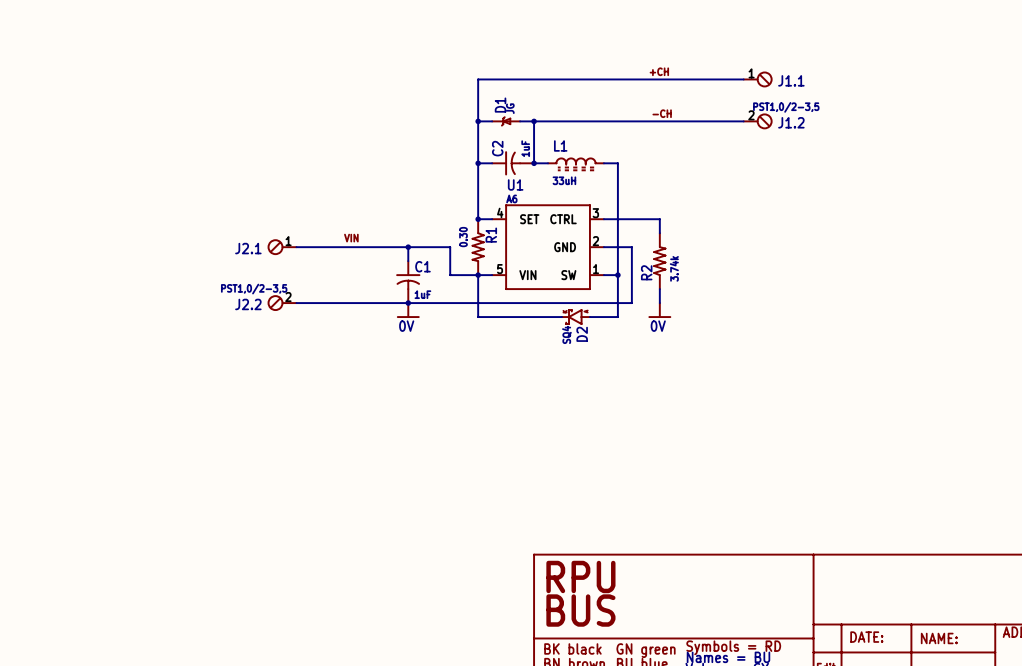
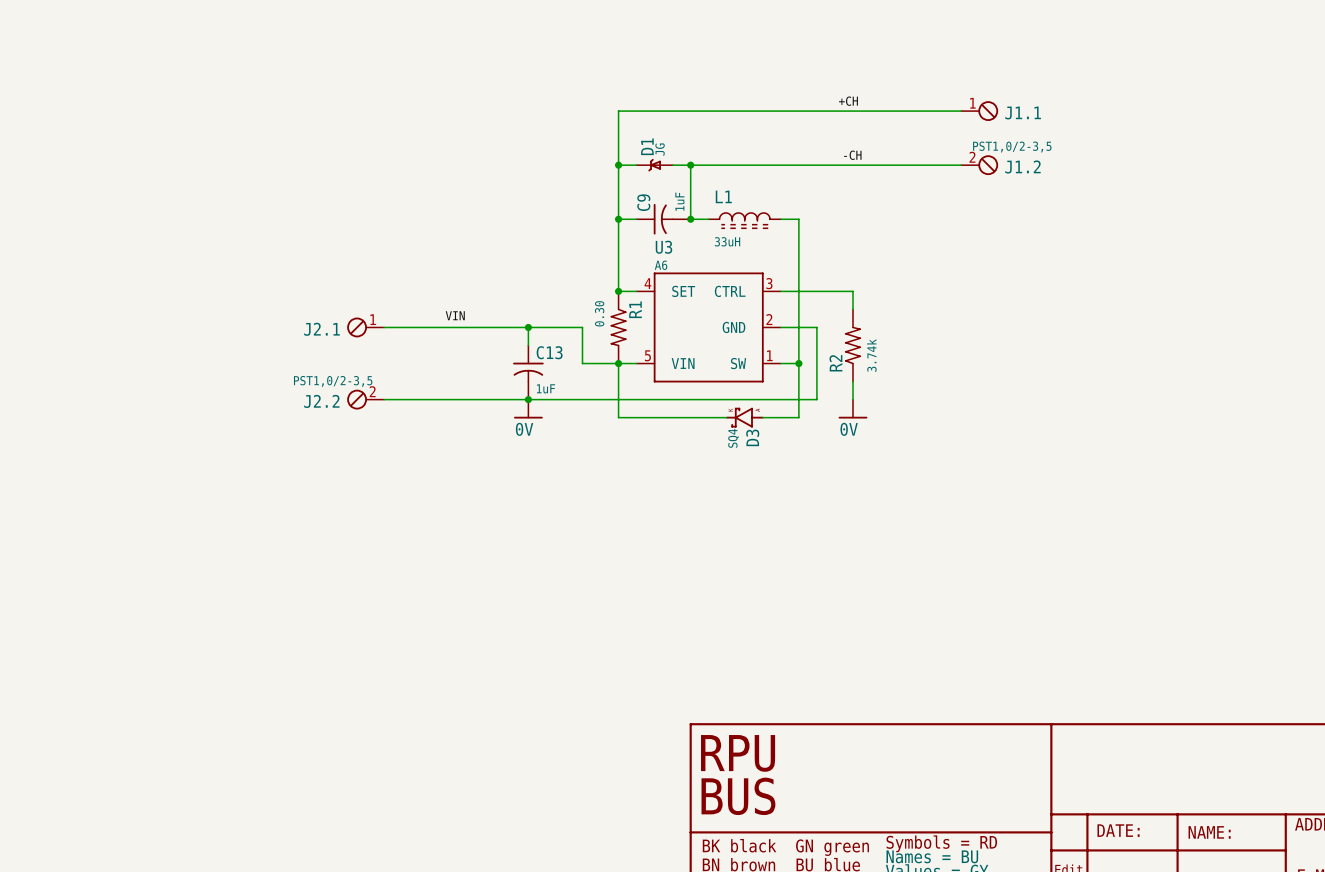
C2 name: C2 (497, 148) -> C9 (643, 202)
U1 name: U1 (515, 184) -> U3 (663, 247)
C1 name: C1 (422, 266) -> C13 (549, 352)
D2 name: D2 (582, 334) -> D3 (752, 437)

